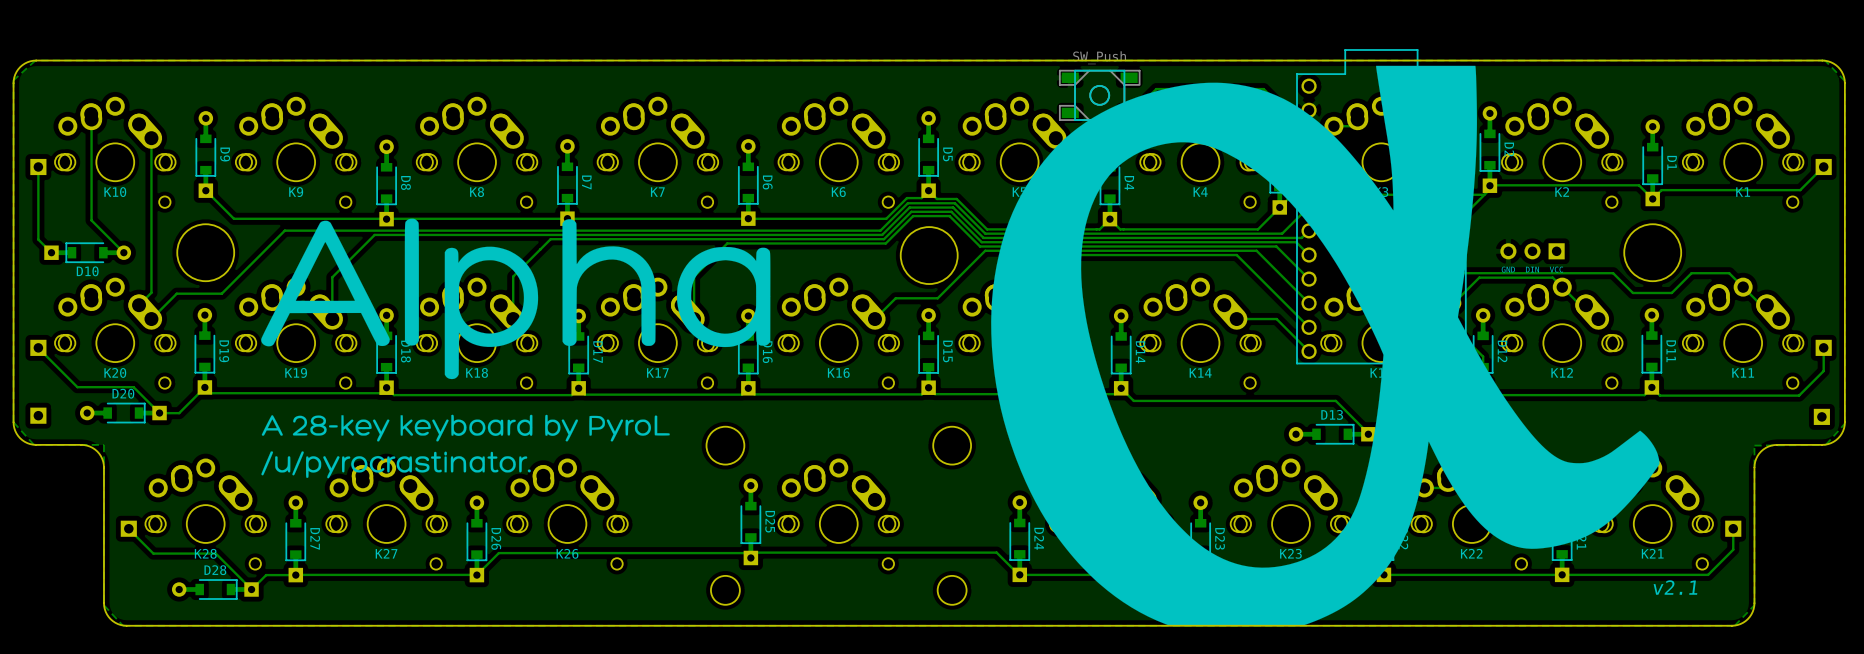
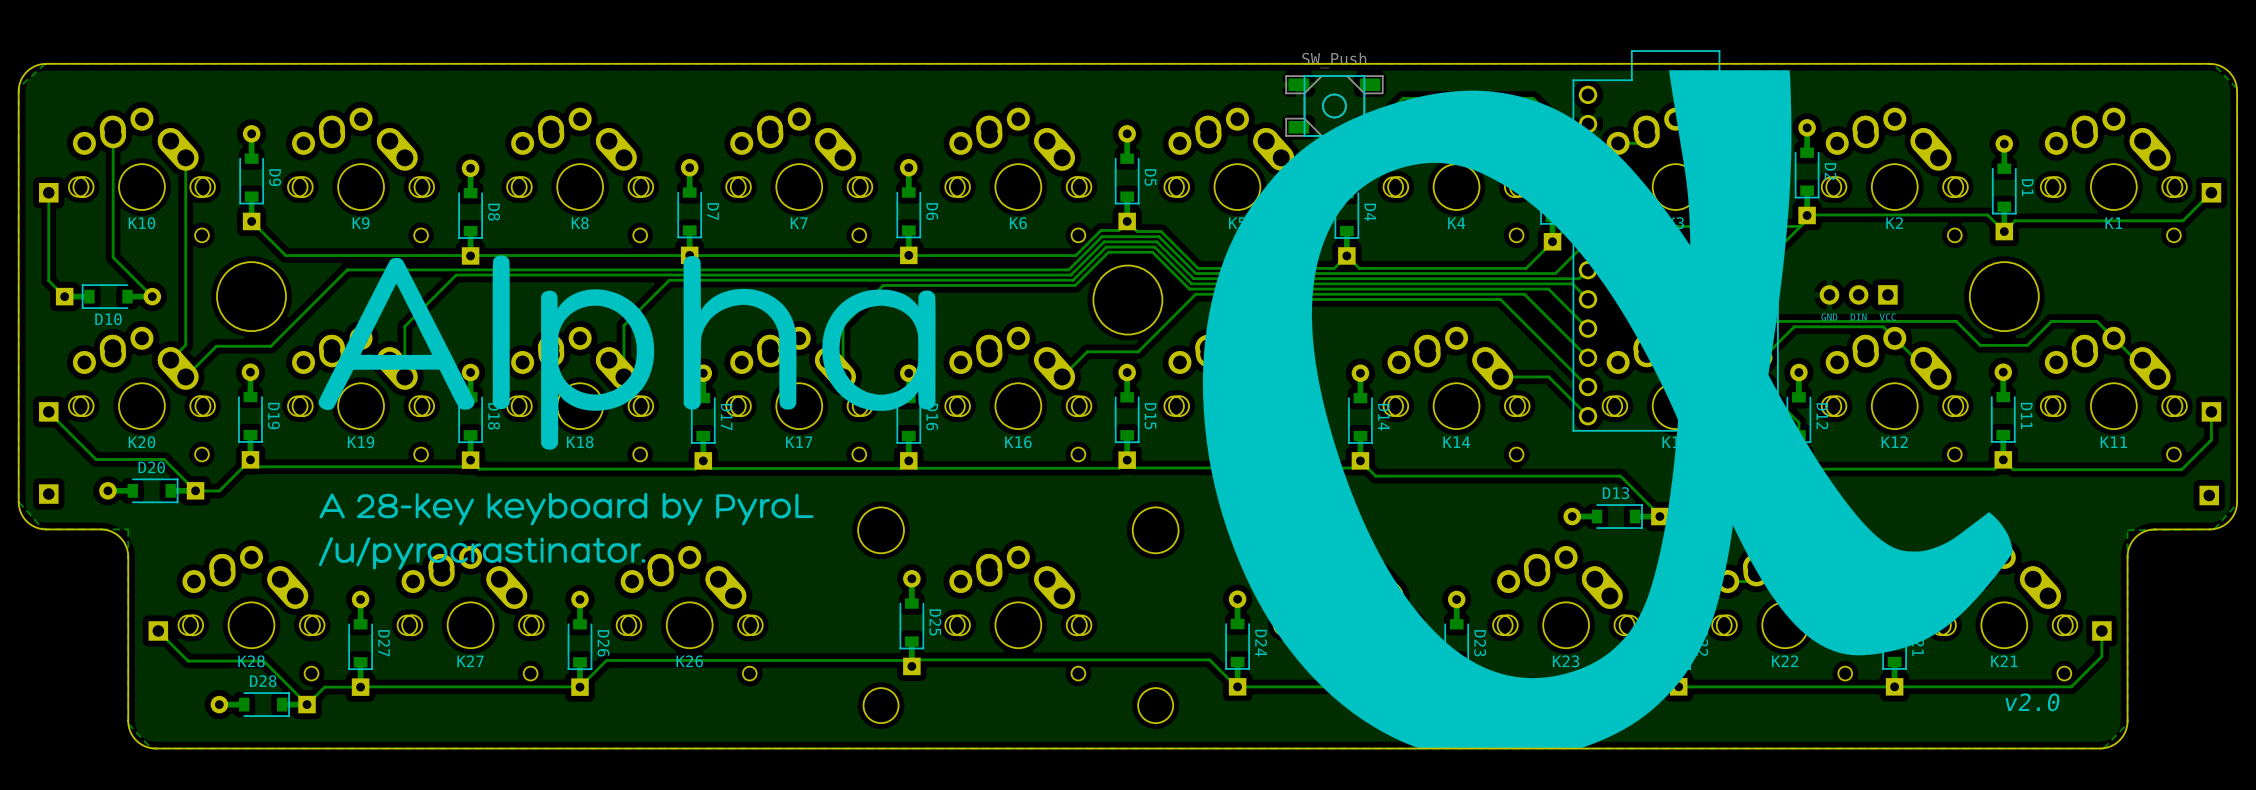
text: v2.1 (1675, 587) -> v2.0 (2032, 702)

